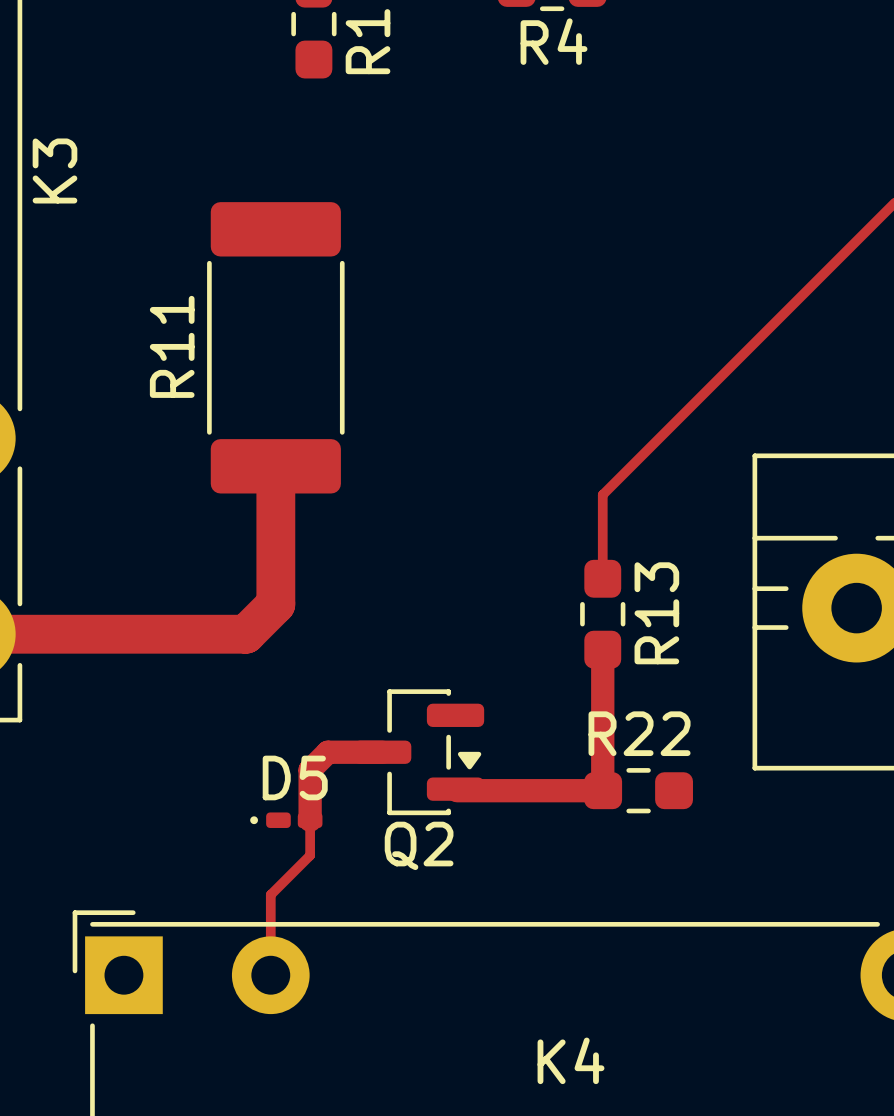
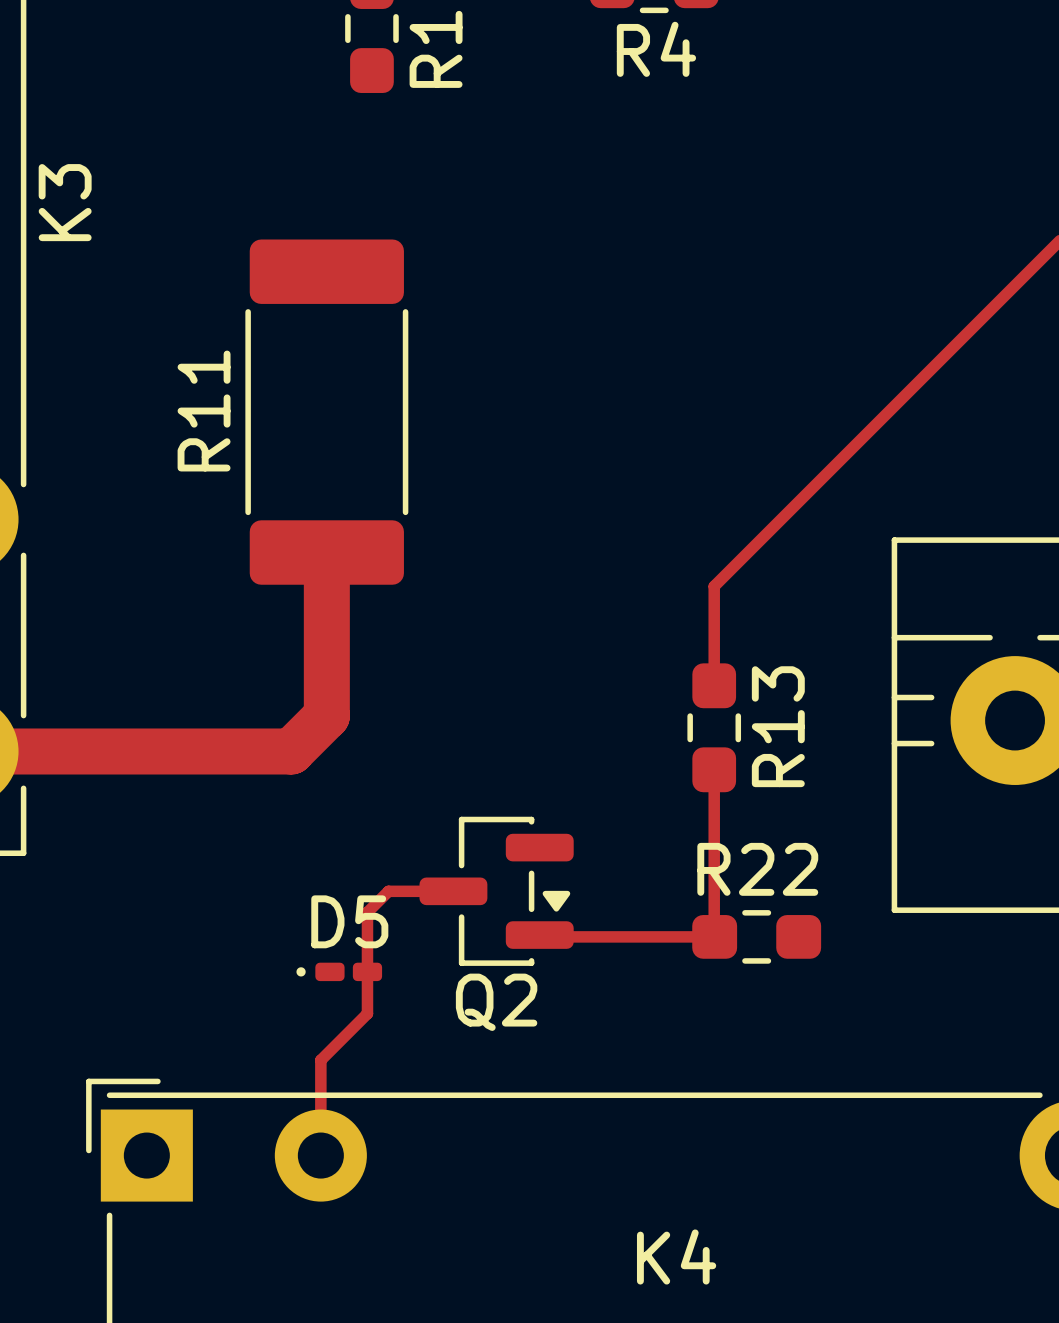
top track width: thick (602, 649) (602, 790) -> thin (714, 769) (714, 936)
top track width: thick (382, 752) (327, 752) (310, 770) (310, 820) -> thin (453, 891) (388, 891) (367, 912) (367, 971)
top track width: thick (457, 790) (603, 790) -> thin (541, 936) (714, 936)

